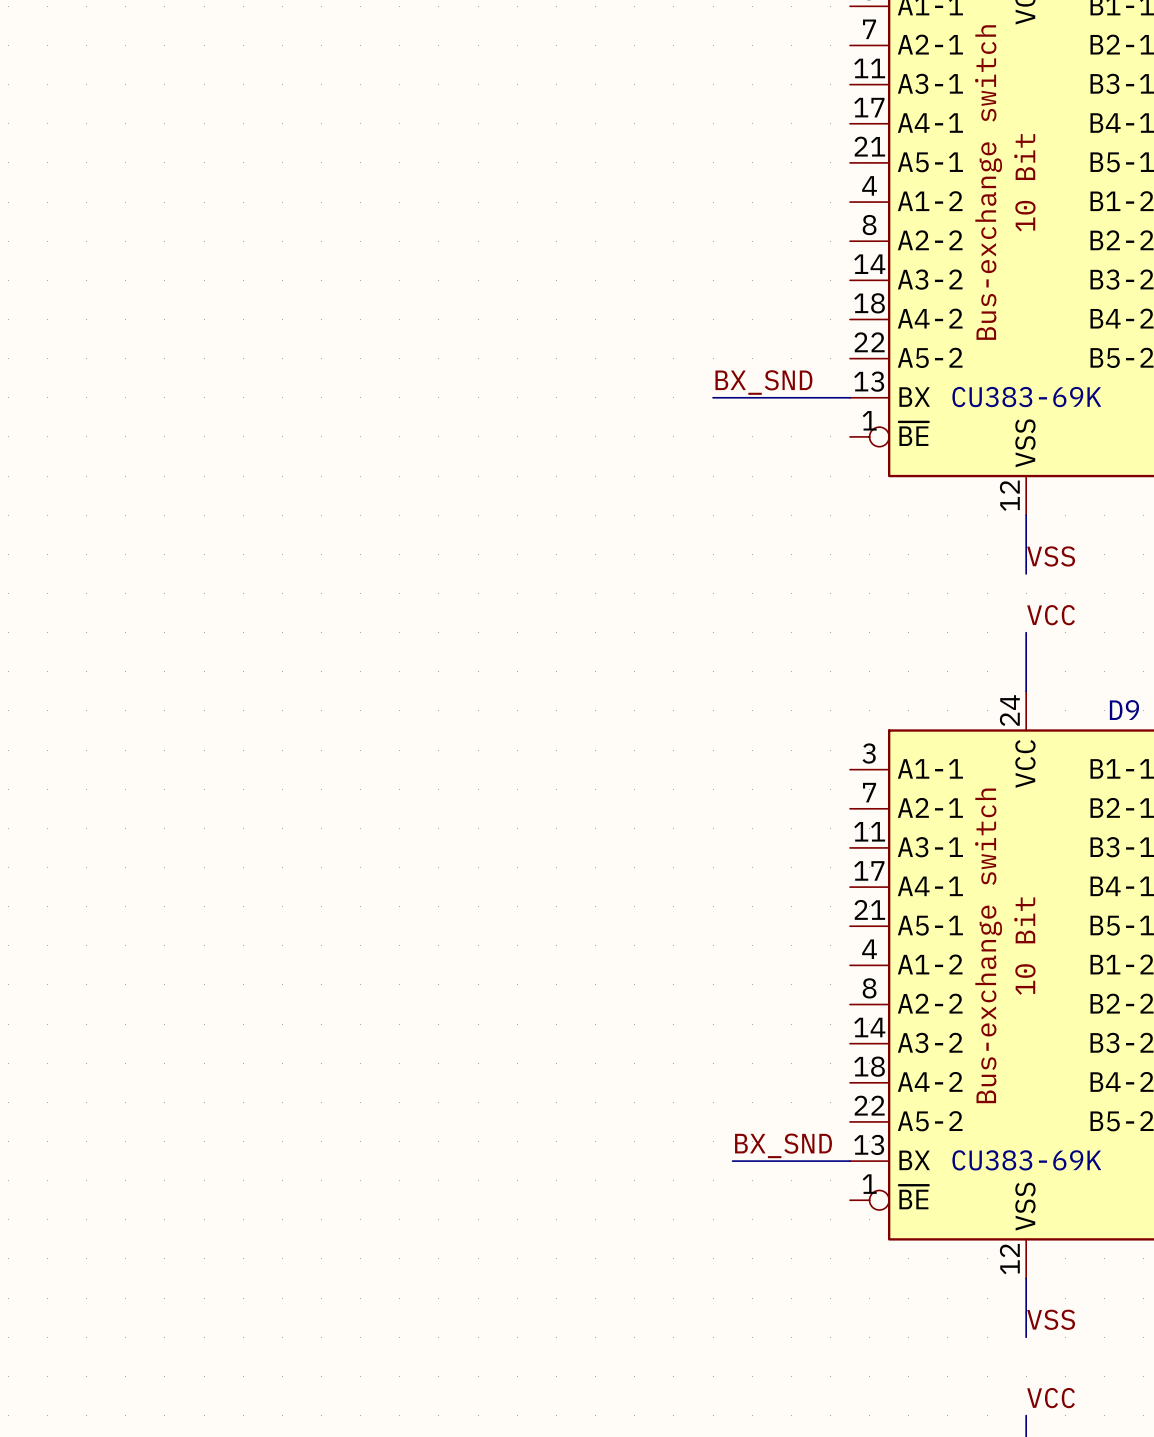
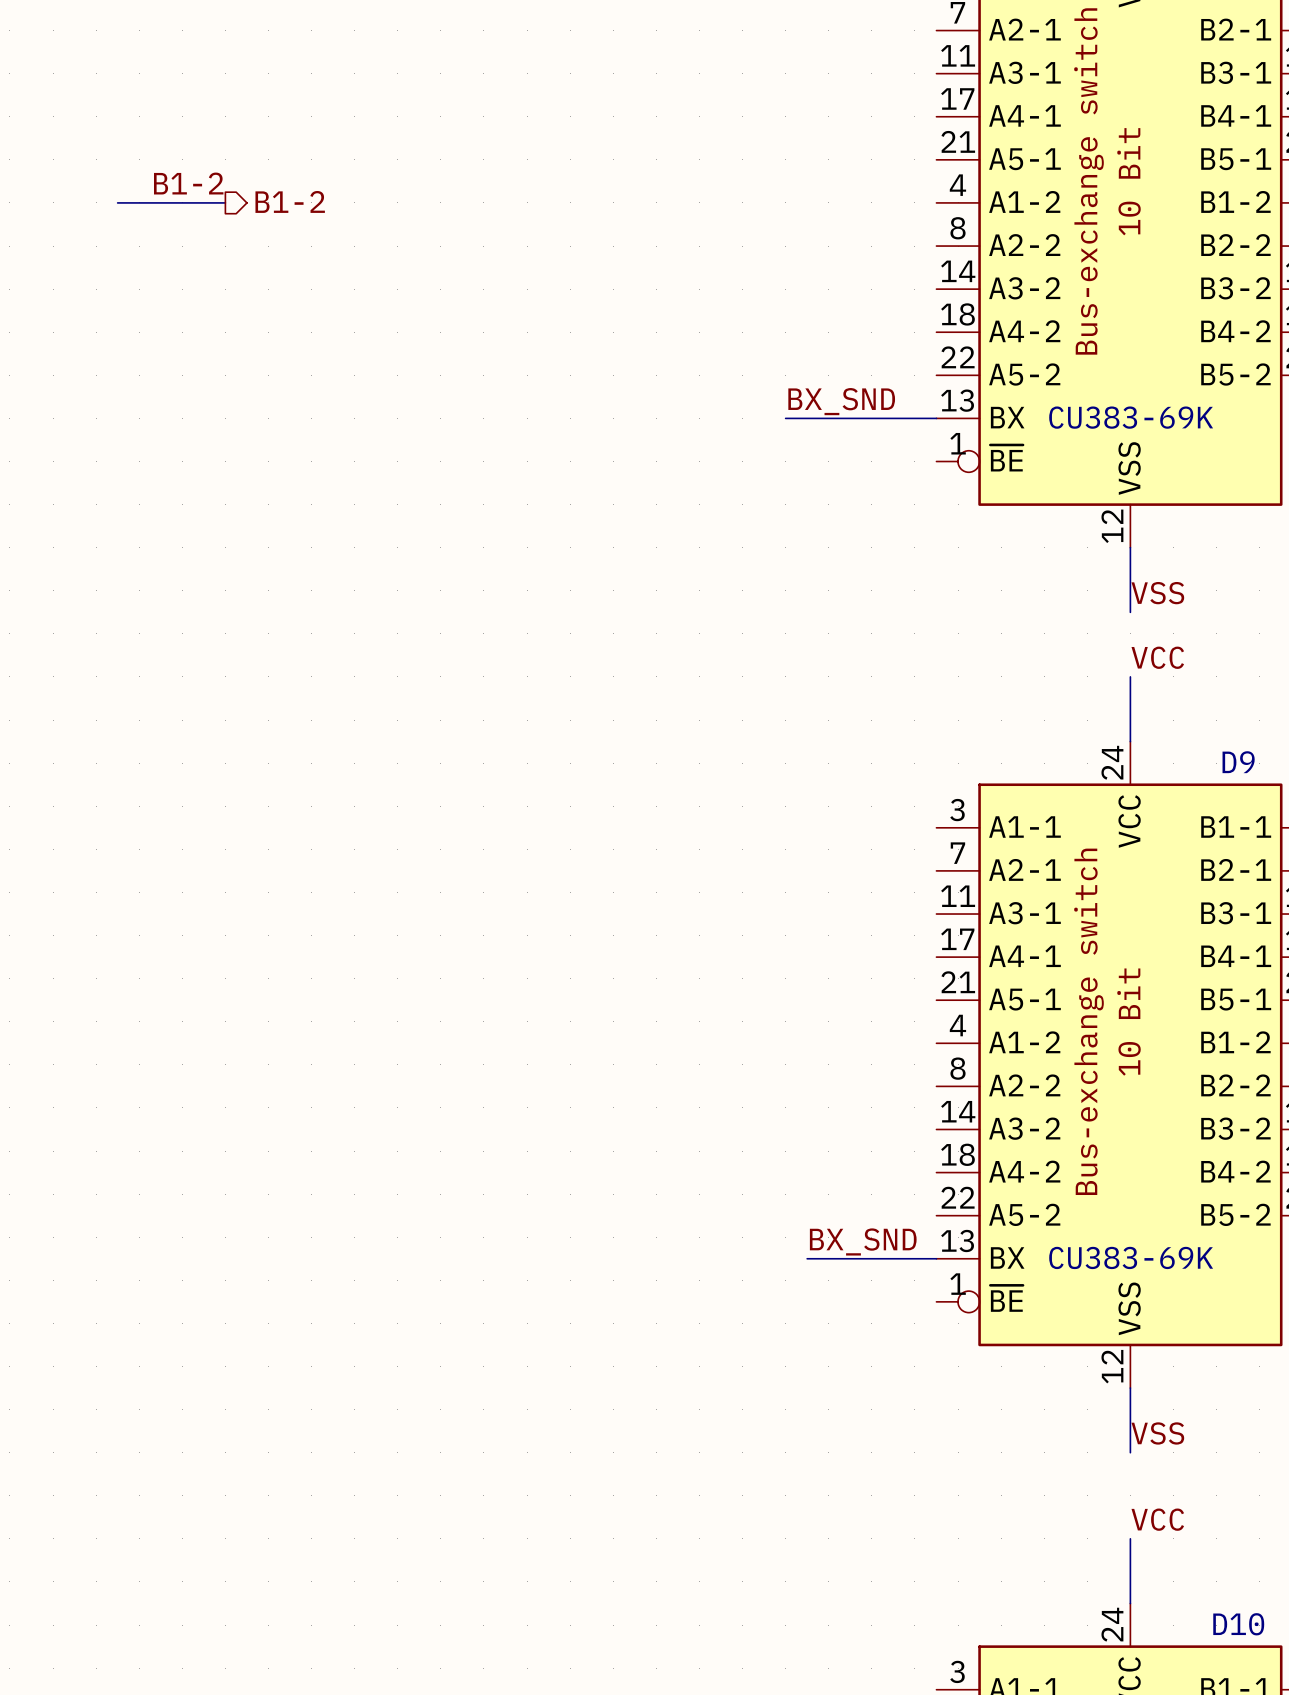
label: none -> B1-2 (188, 183)
hierarchical label: none -> B1-2 (290, 201)
wire: none -> (117, 202) (225, 202)

